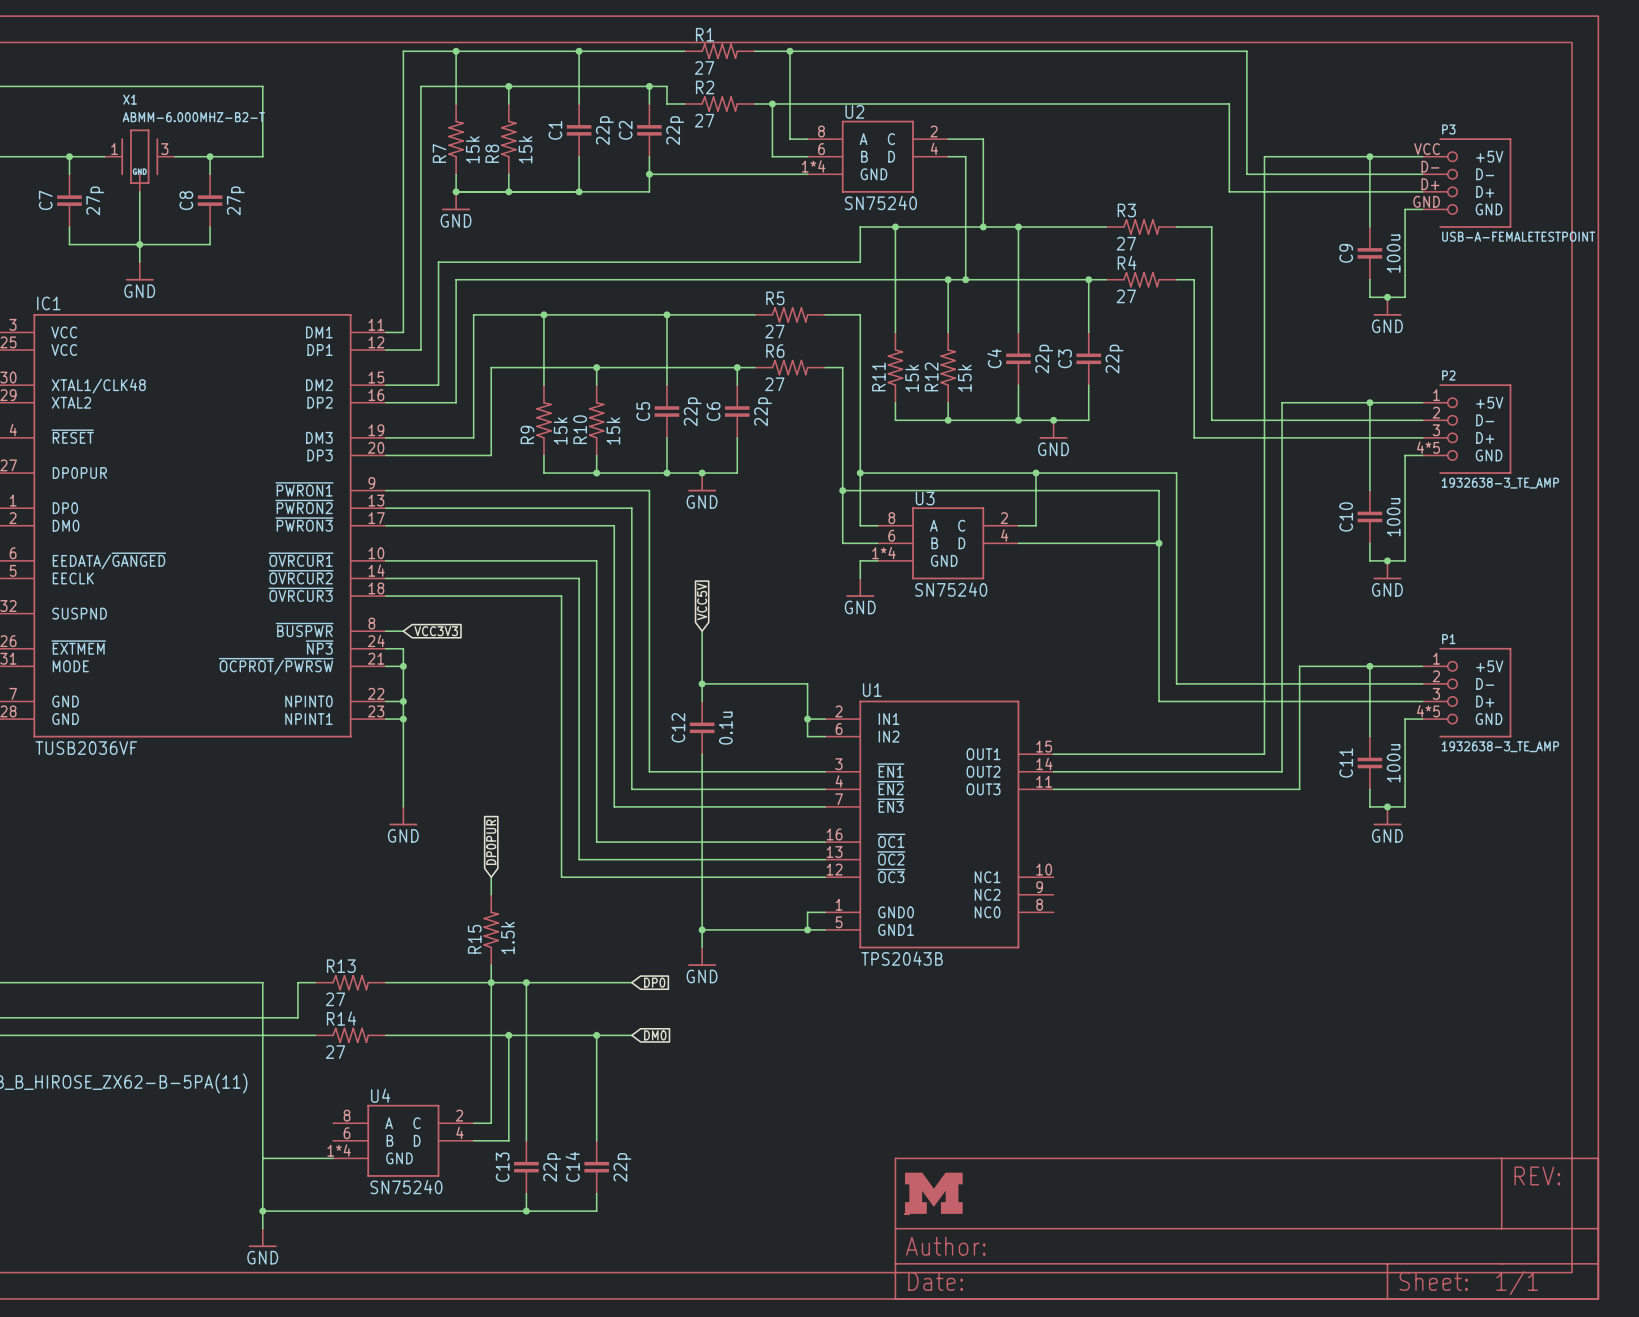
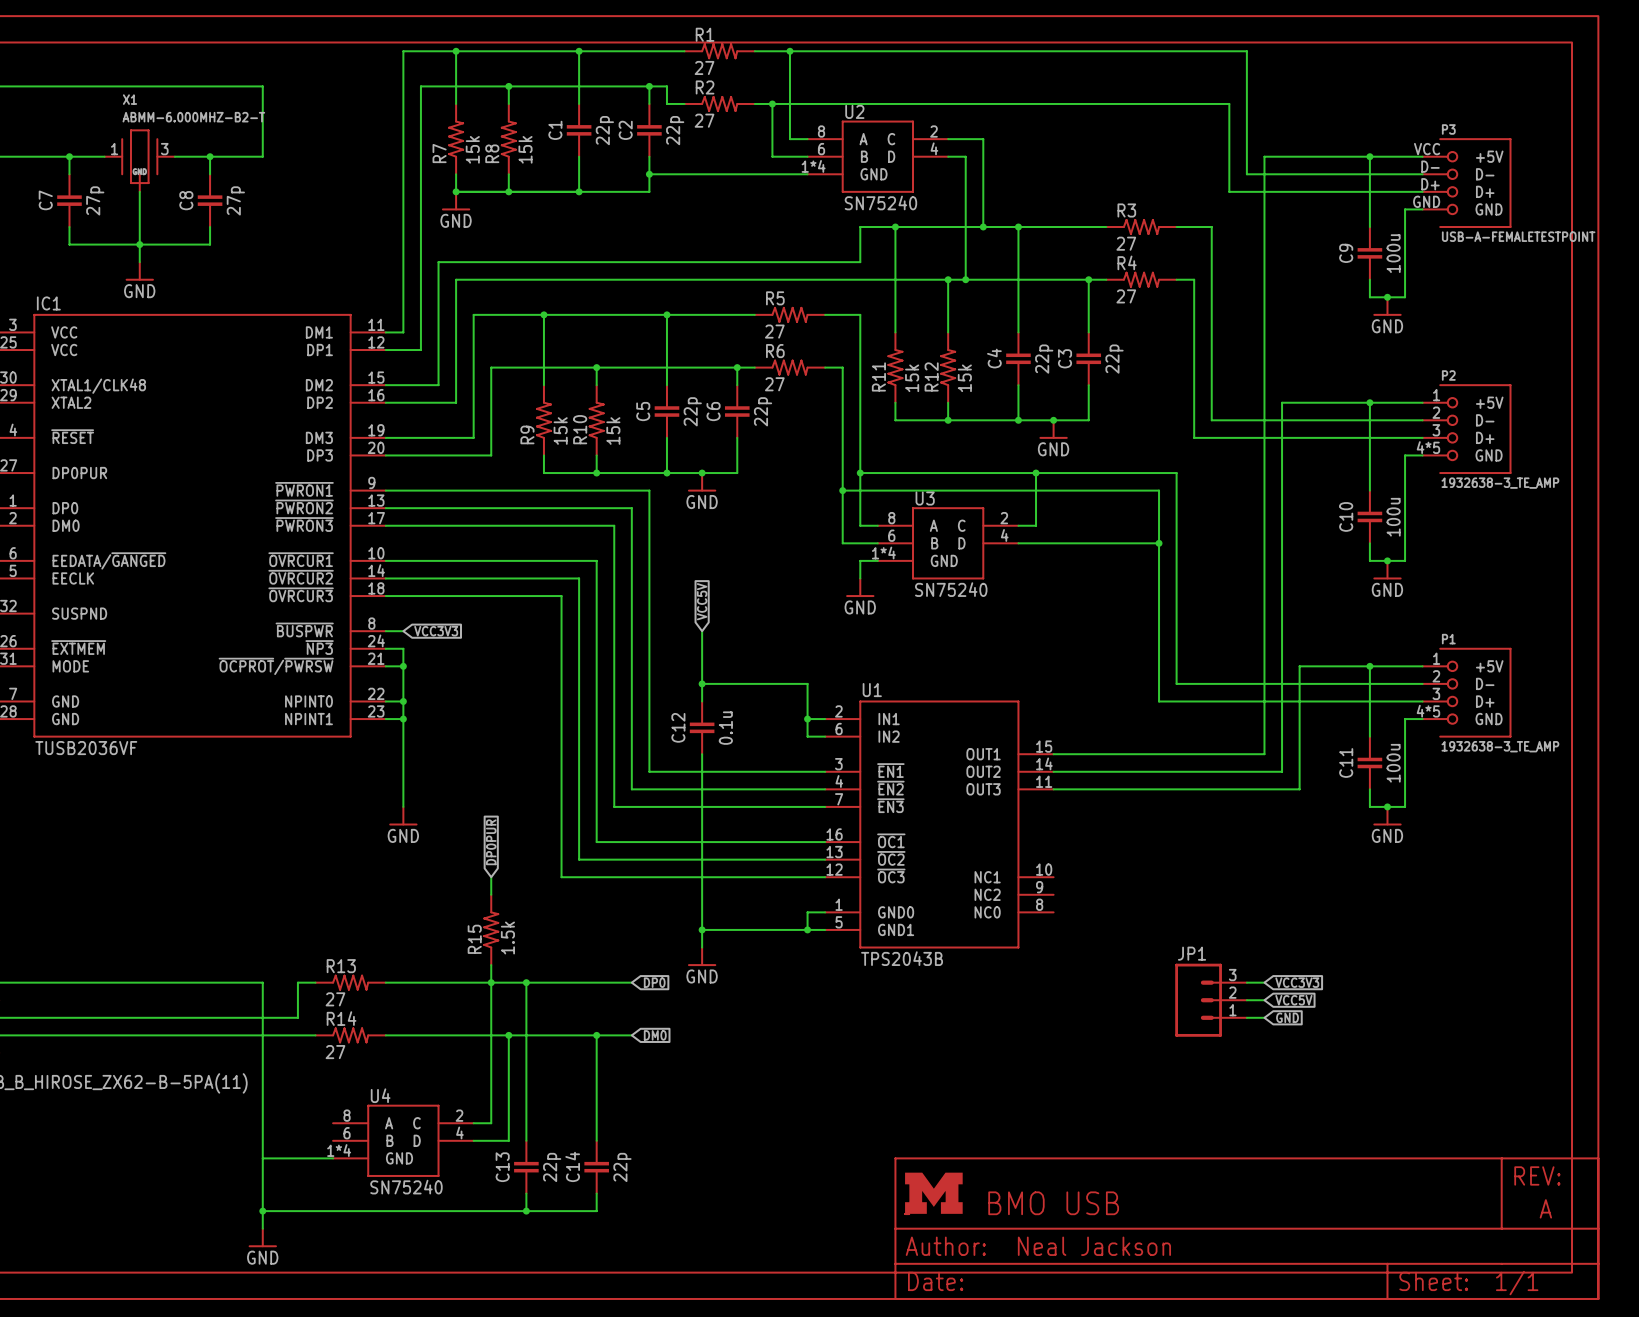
wire: none -> (1246, 982) (1264, 982)
global label: none -> VCC3V3 (1297, 982)
JP1: none -> (1211, 1000)
wire: none -> (1246, 1000) (1264, 1000)
global label: none -> VCC5V (1293, 1000)
wire: none -> (1246, 1017) (1264, 1017)
global label: none -> GND (1287, 1017)
part text: none -> BMO USB (1053, 1203)
part text: none -> A (1545, 1208)
part text: none -> Neal Jackson (1094, 1246)

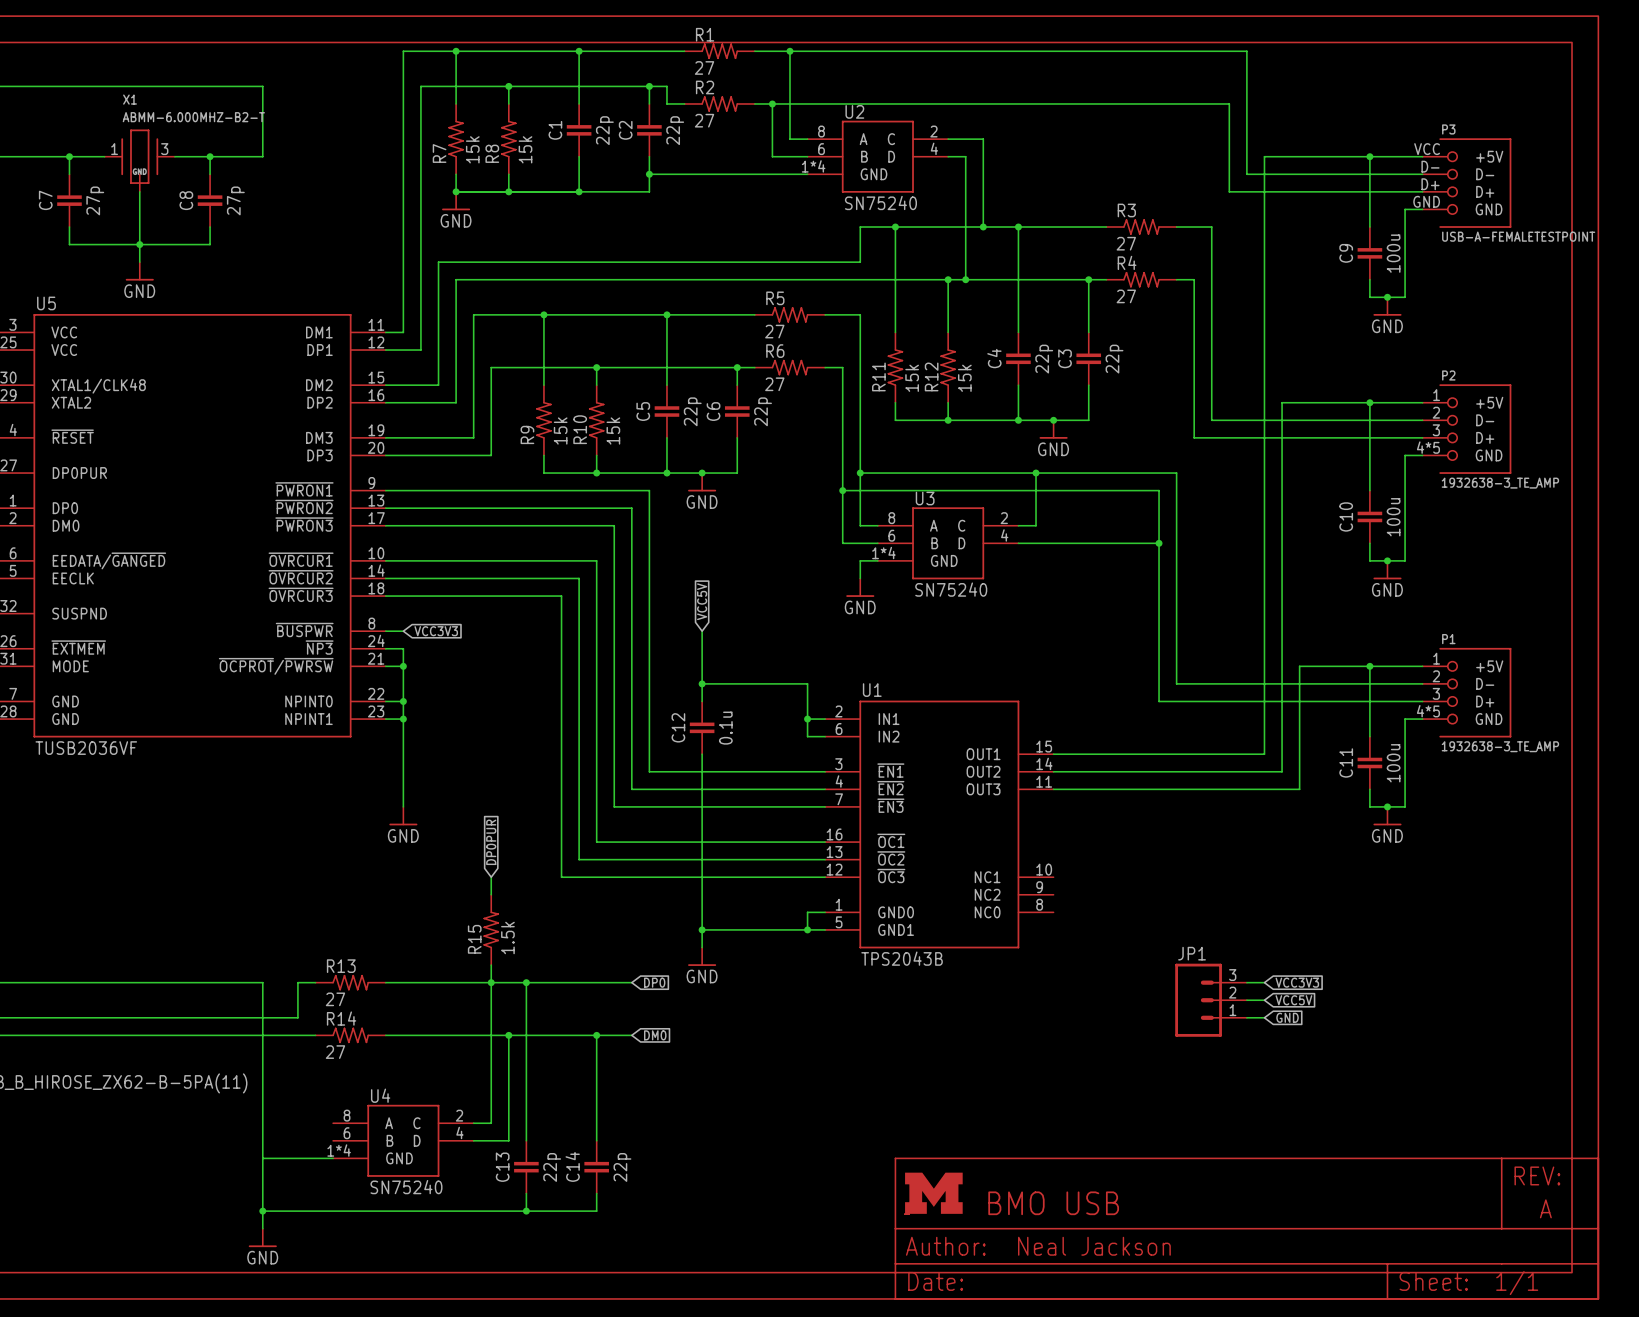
IC1 name: IC1 (48, 303) -> U5 (46, 303)

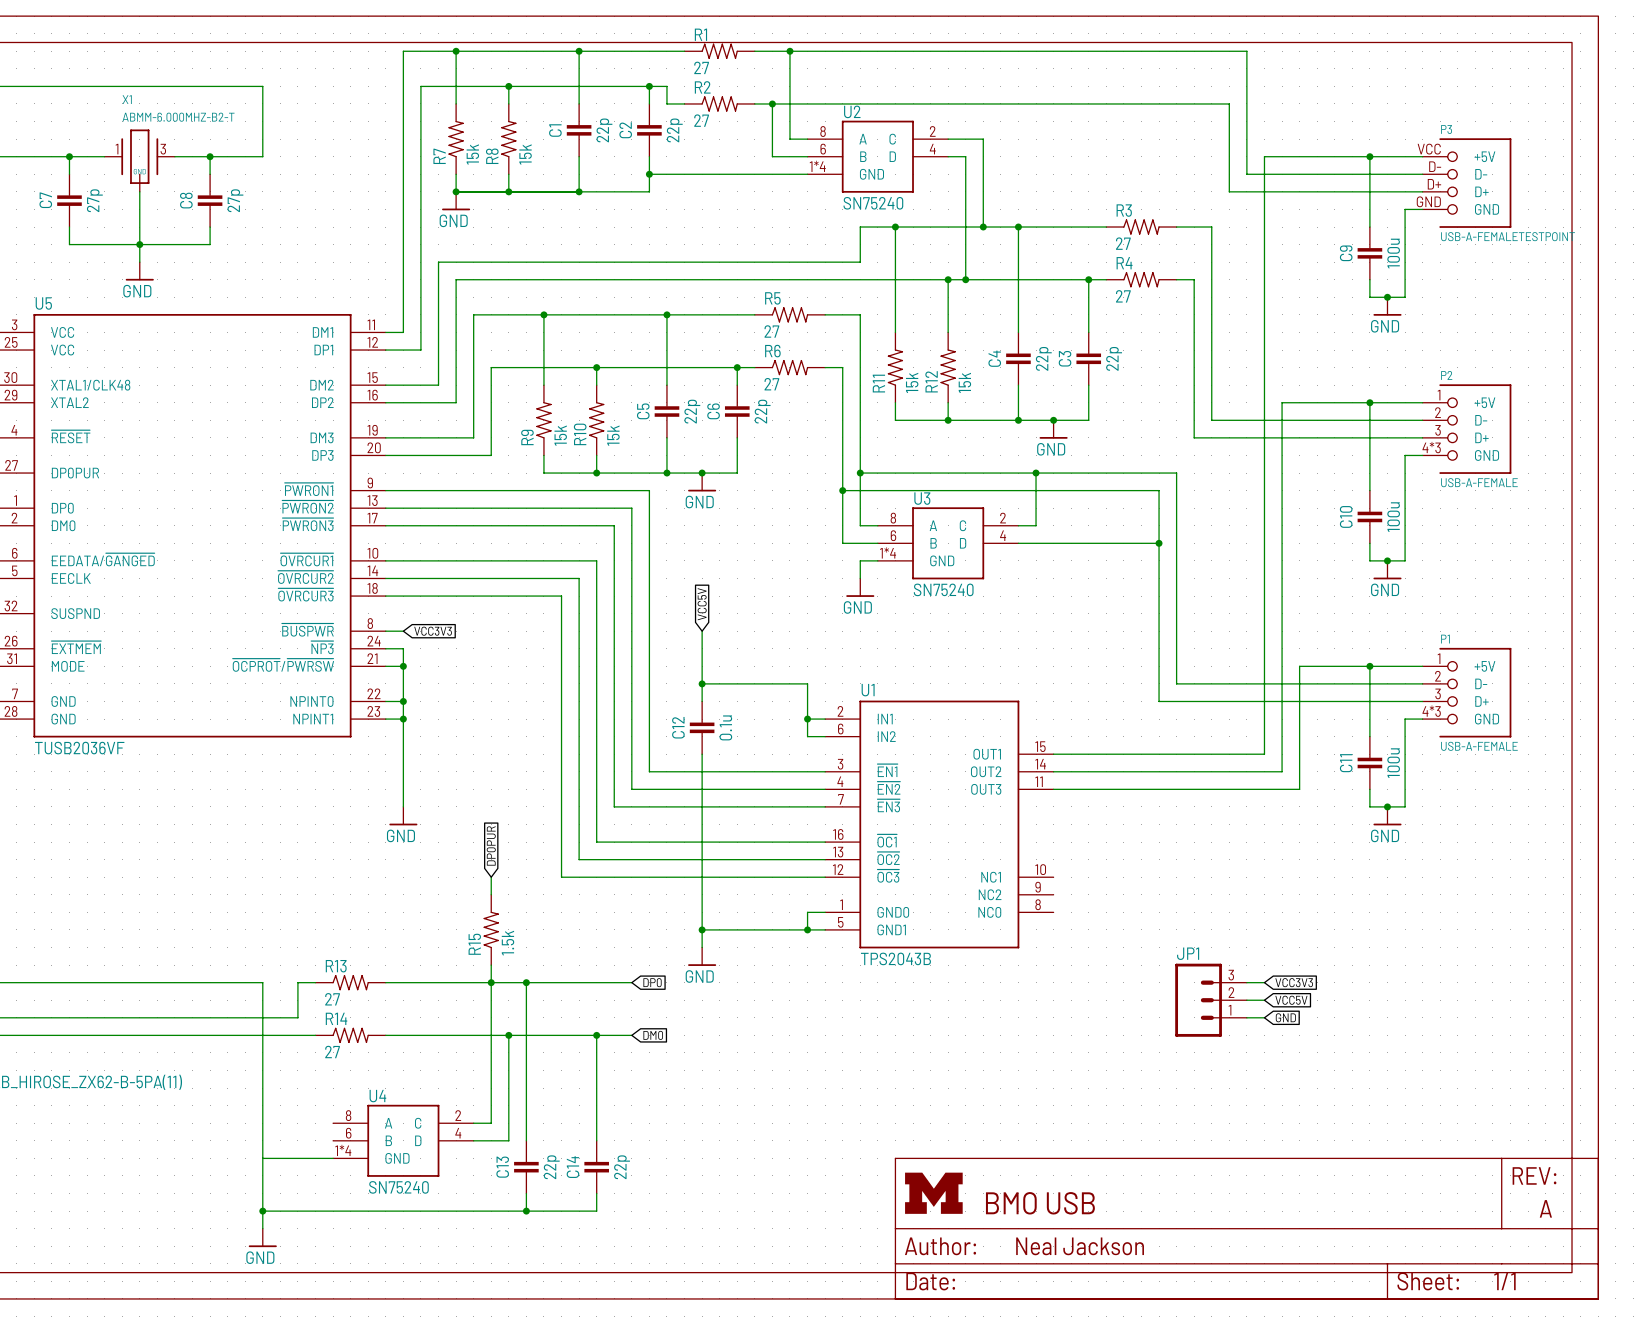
P2 pin number: 4*5 (1428, 447) -> 4*3 (1431, 447)
P2 value: 1932638-3_TE_AMP (1500, 483) -> USB-A-FEMALE (1479, 482)
P1 pin number: 4*5 (1428, 711) -> 4*3 (1431, 711)
P1 value: 1932638-3_TE_AMP (1500, 746) -> USB-A-FEMALE (1479, 746)

